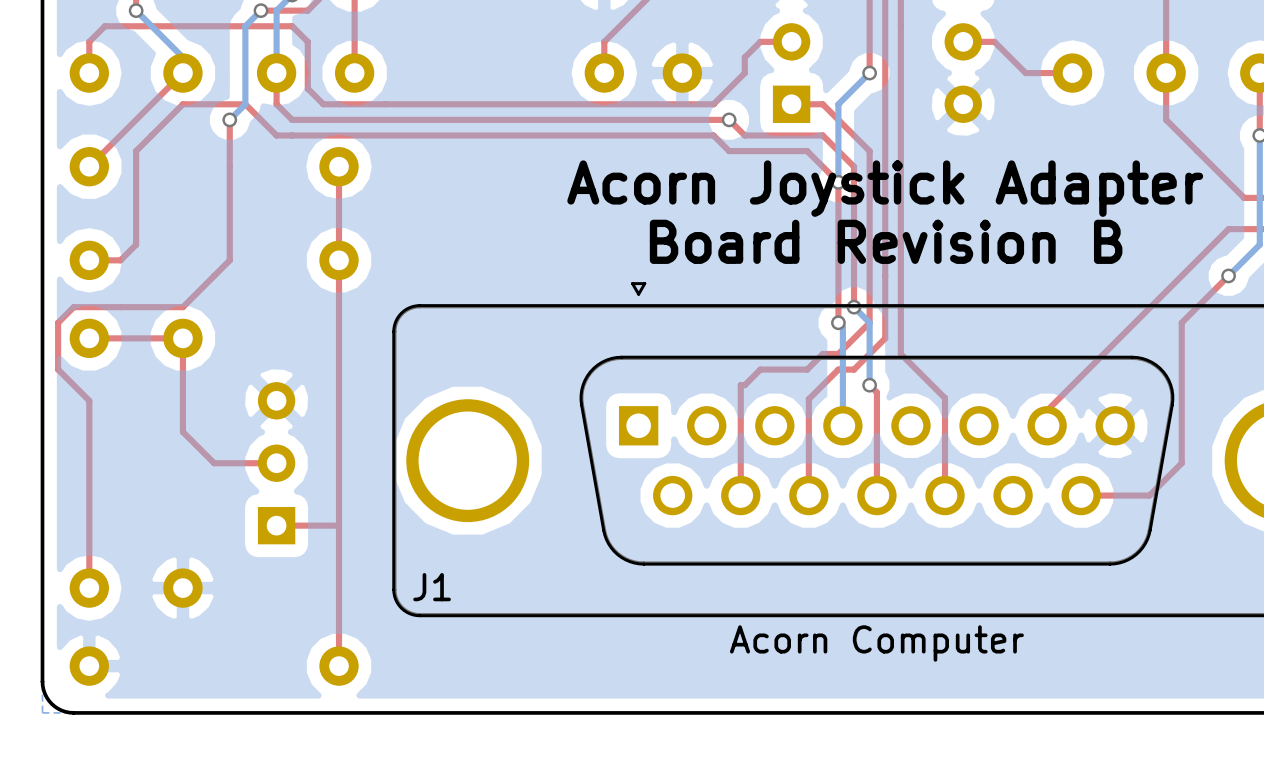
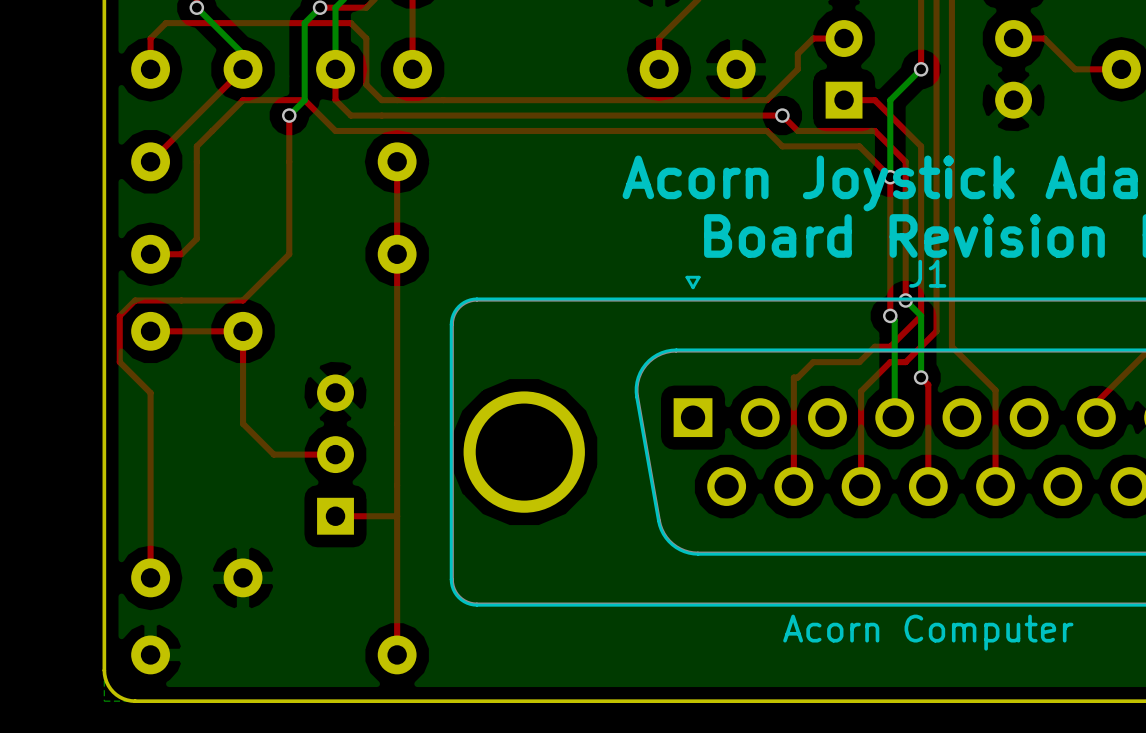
J1 name position: J1 (432, 587) -> J1 (927, 273)

